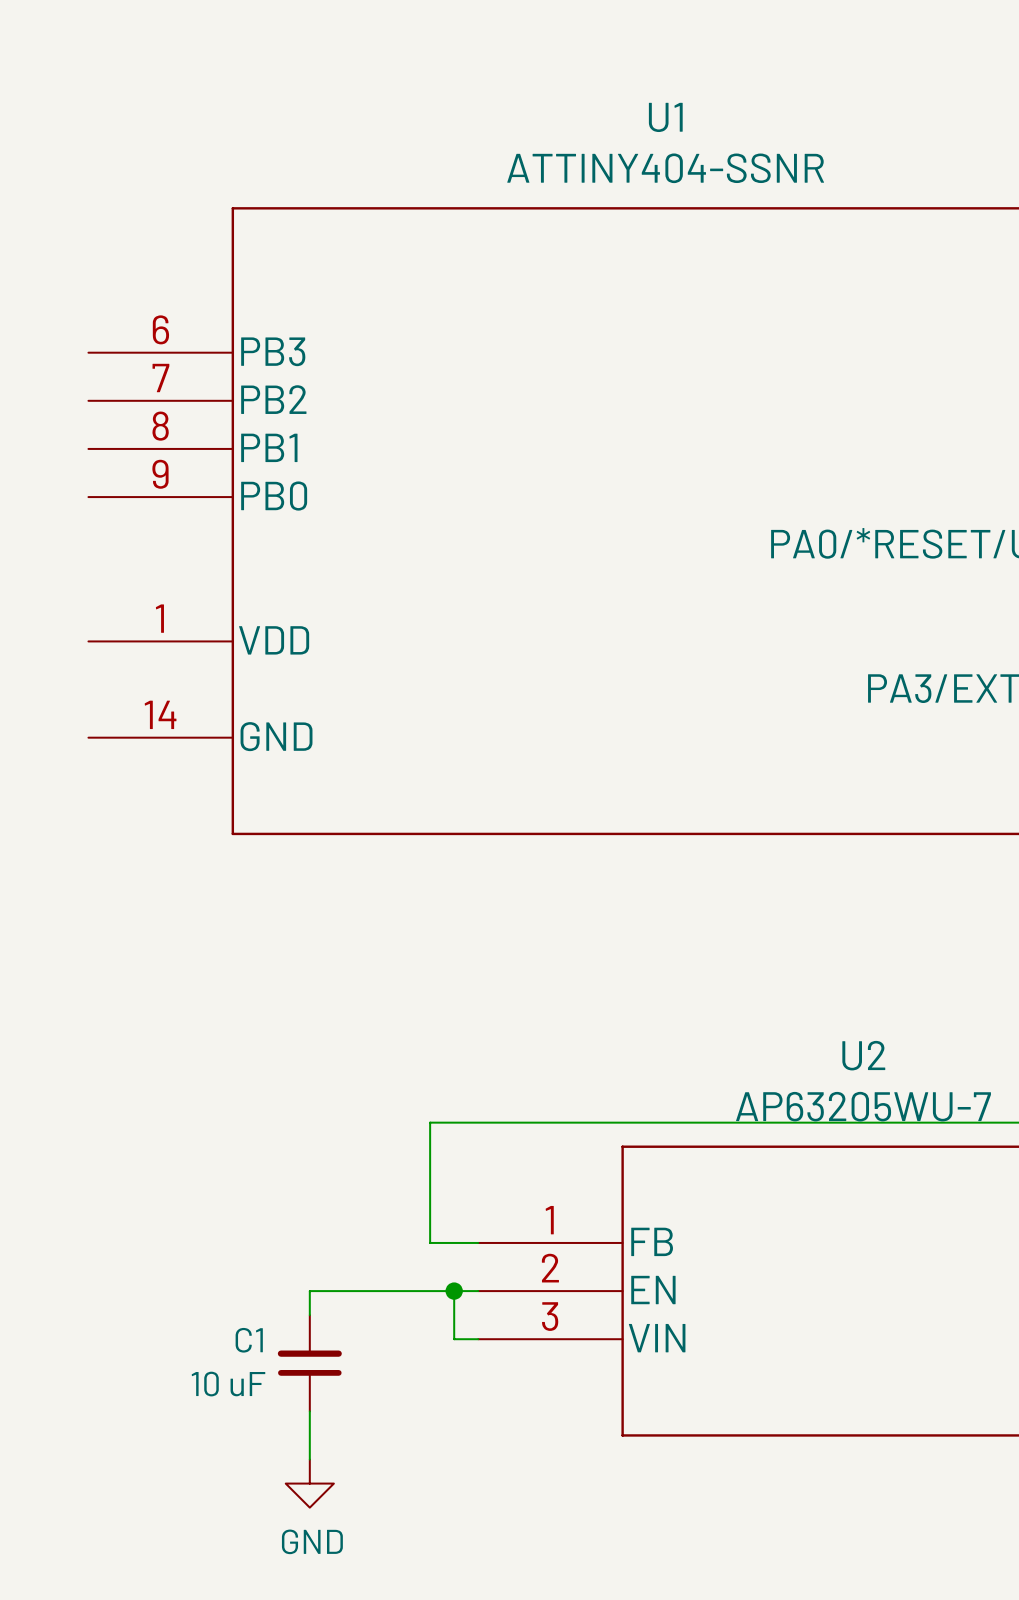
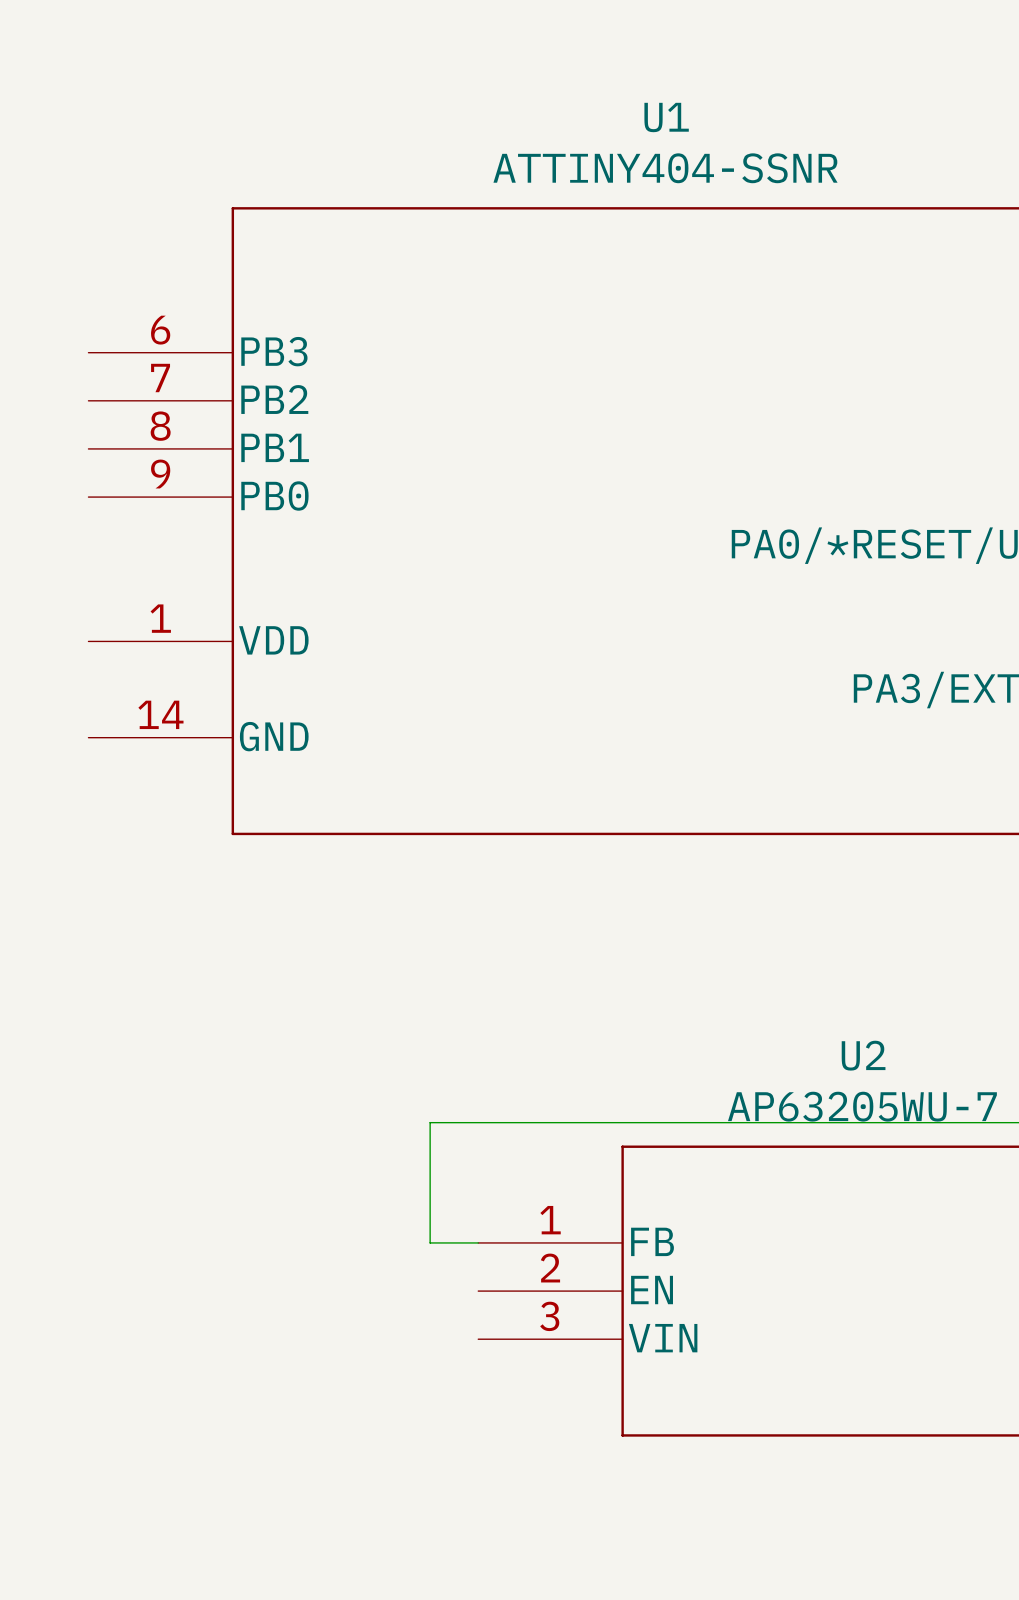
wire: (454, 1291) (454, 1339) (478, 1339) -> none
junction: (454, 1291) -> none
wire: (478, 1291) (309, 1291) (309, 1315) -> none
C1: 10 uF (309, 1363) -> none
wire: (309, 1411) (309, 1459) -> none
power symbol: GND (309, 1483) -> none

